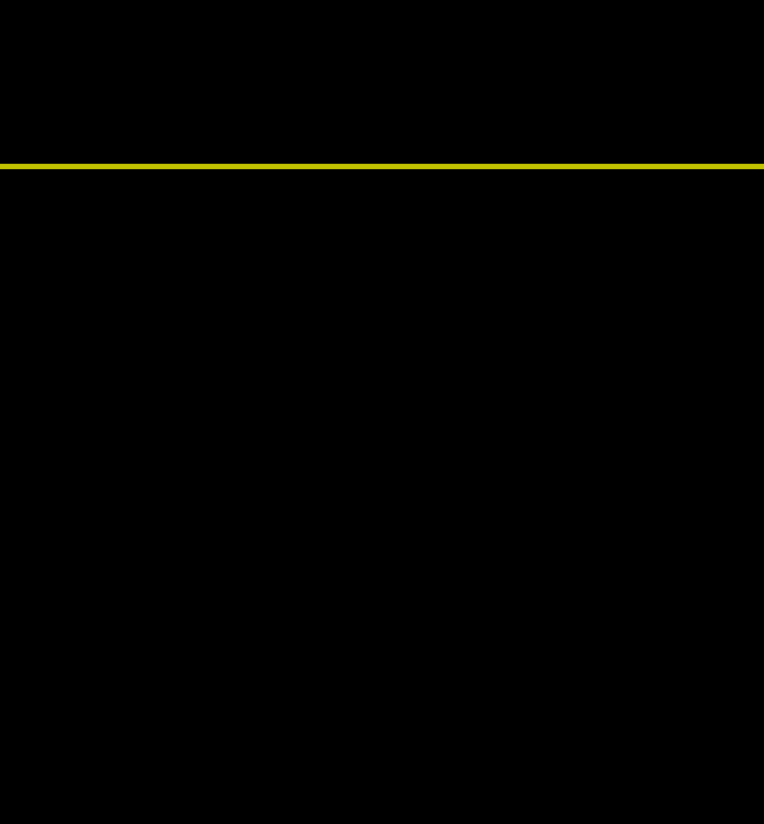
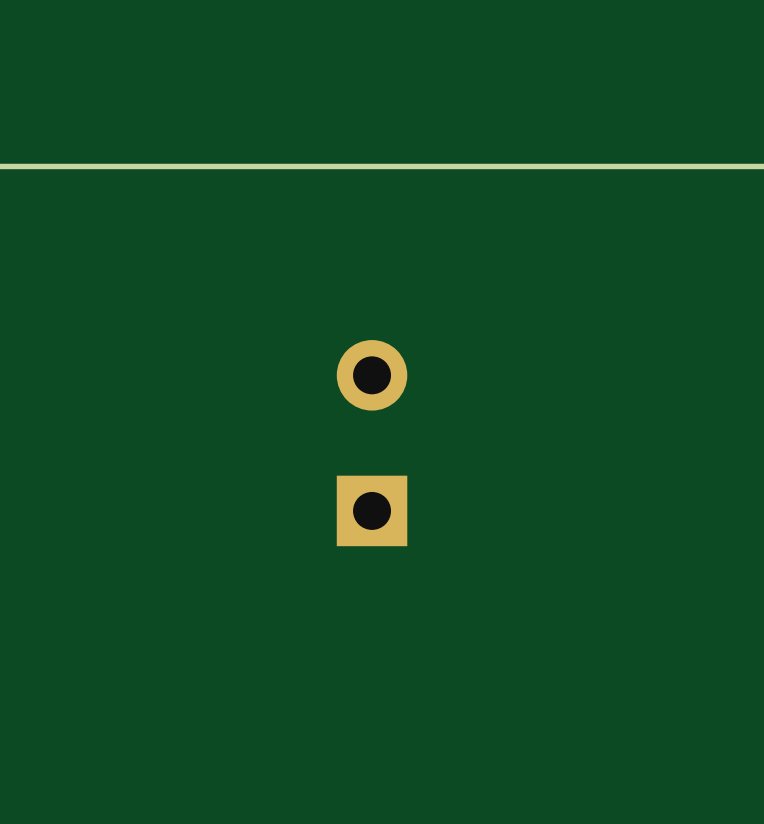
part: none -> (372, 443)

